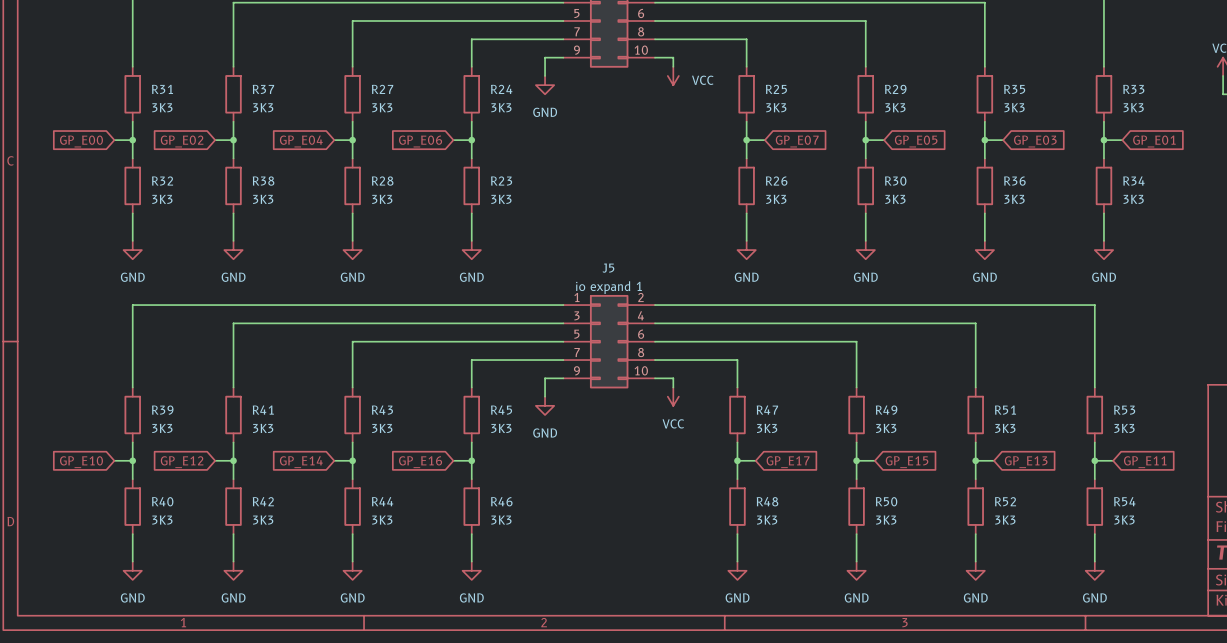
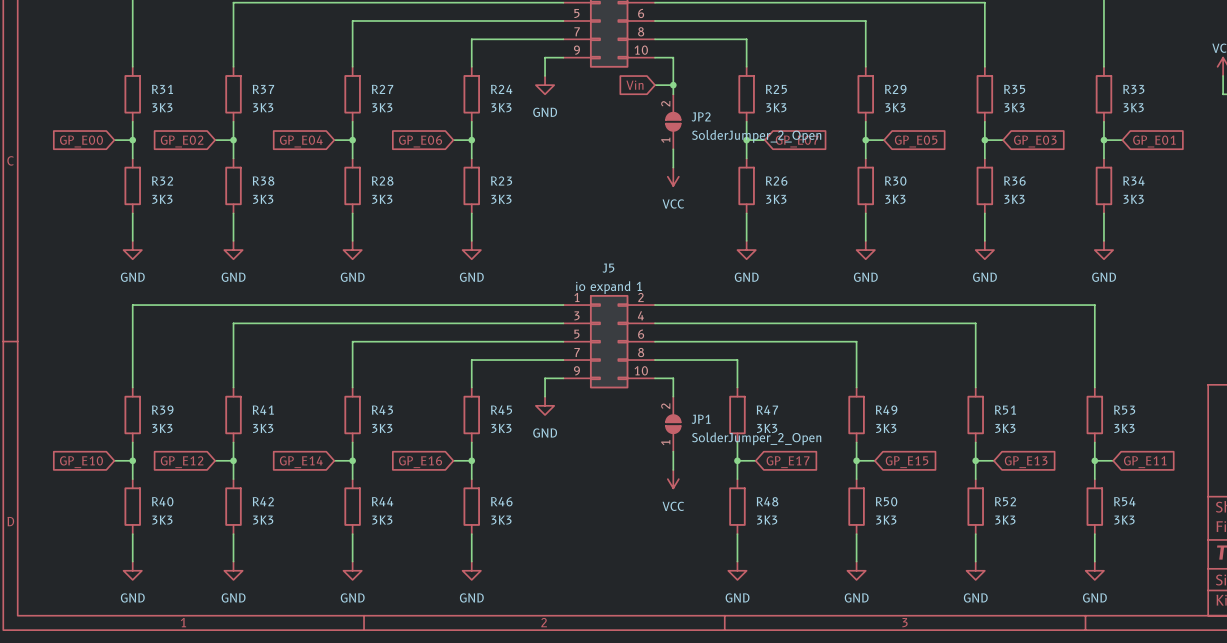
power symbol position: VCC (673, 75) -> VCC (673, 176)
power symbol text position: VCC (702, 80) -> VCC (673, 203)
global label: none -> Vin (634, 85)
wire: none -> (654, 85) (673, 85)
junction: none -> (673, 85)
JP2: none -> SolderJumper_2_Open (673, 121)
wire: none -> (673, 149) (673, 167)
power symbol position: VCC (673, 396) -> VCC (673, 479)
JP1: none -> SolderJumper_2_Open (673, 424)
wire: none -> (673, 451) (673, 469)

